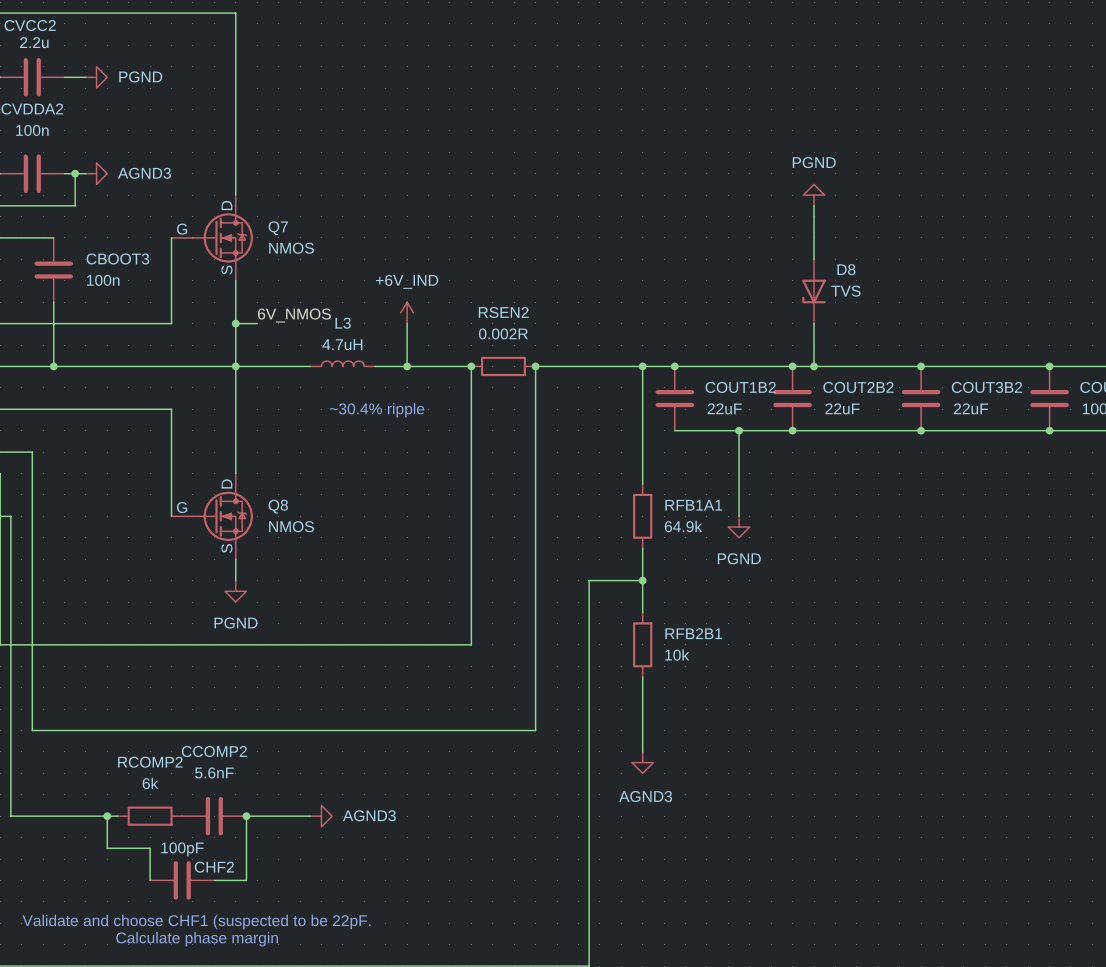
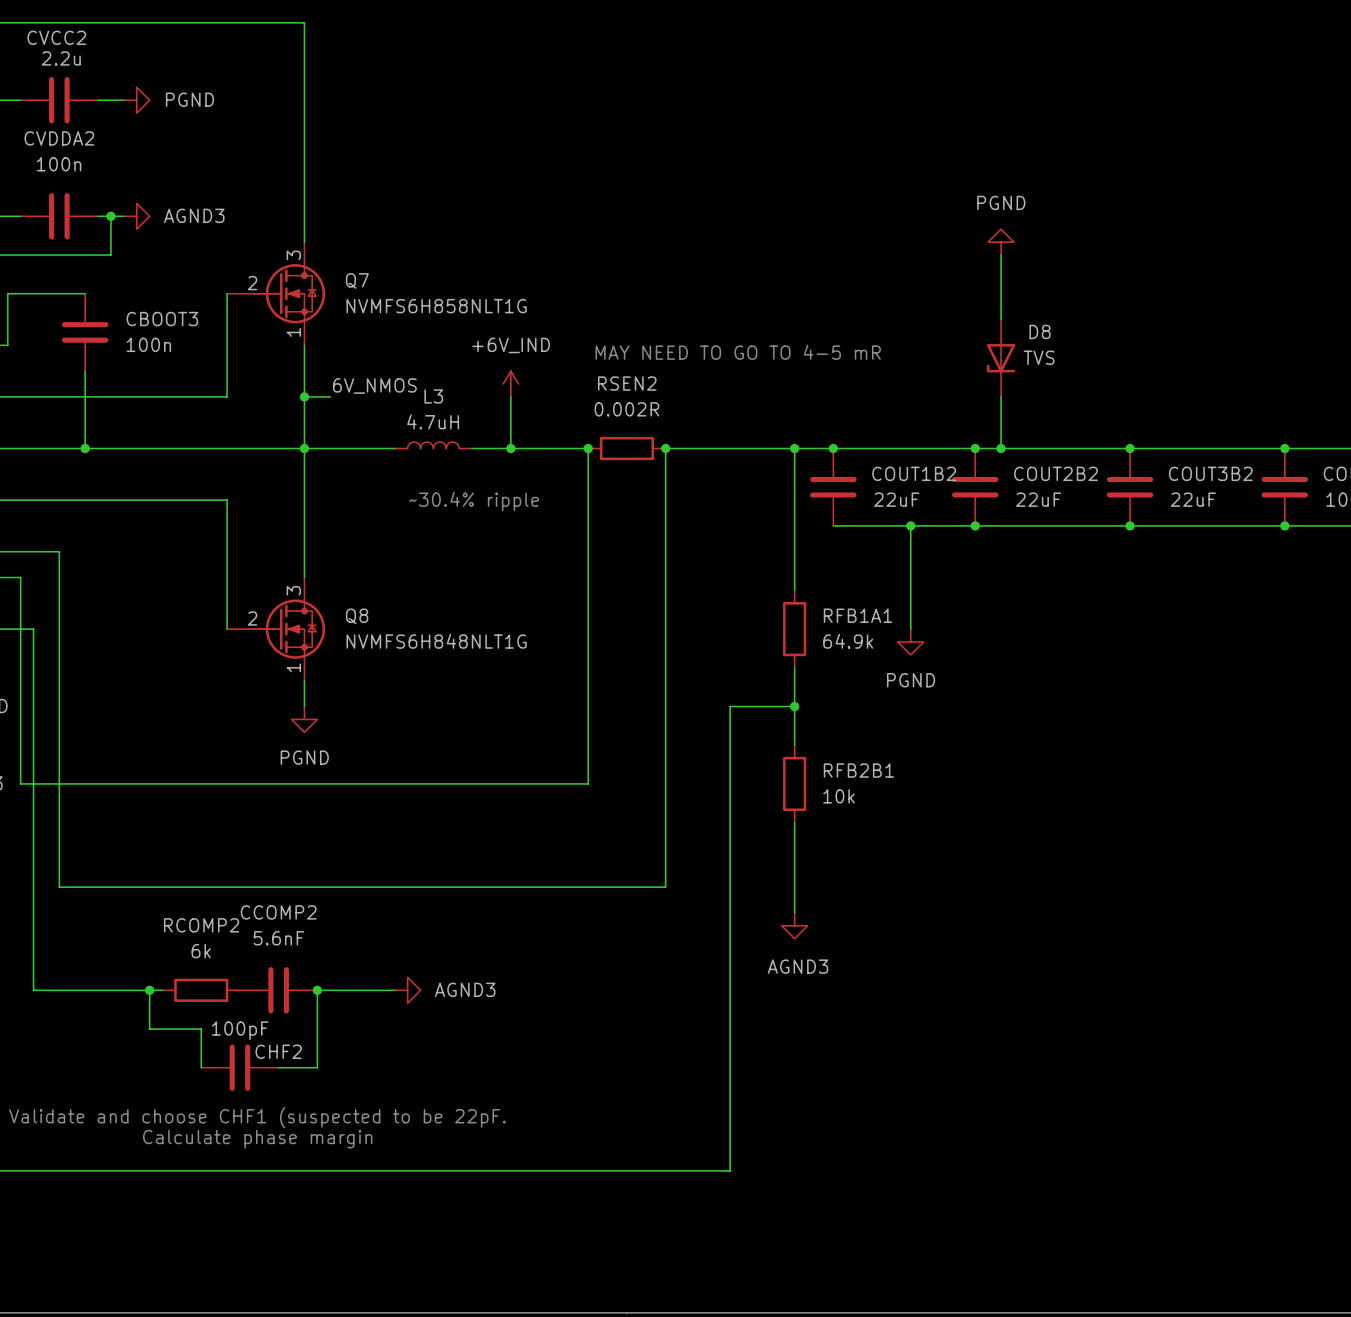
Q7 symbol: [171, 195, 253, 281] -> [227, 242, 326, 346]
Q7 value: NMOS (291, 248) -> NVMFS6H858NLT1G (436, 306)
text: none -> MAY NEED TO GO TO 4-5 mR (738, 352)
Q8 symbol: [171, 473, 253, 560] -> [227, 577, 326, 681]
Q8 value: NMOS (291, 526) -> NVMFS6H848NLT1G (436, 641)

